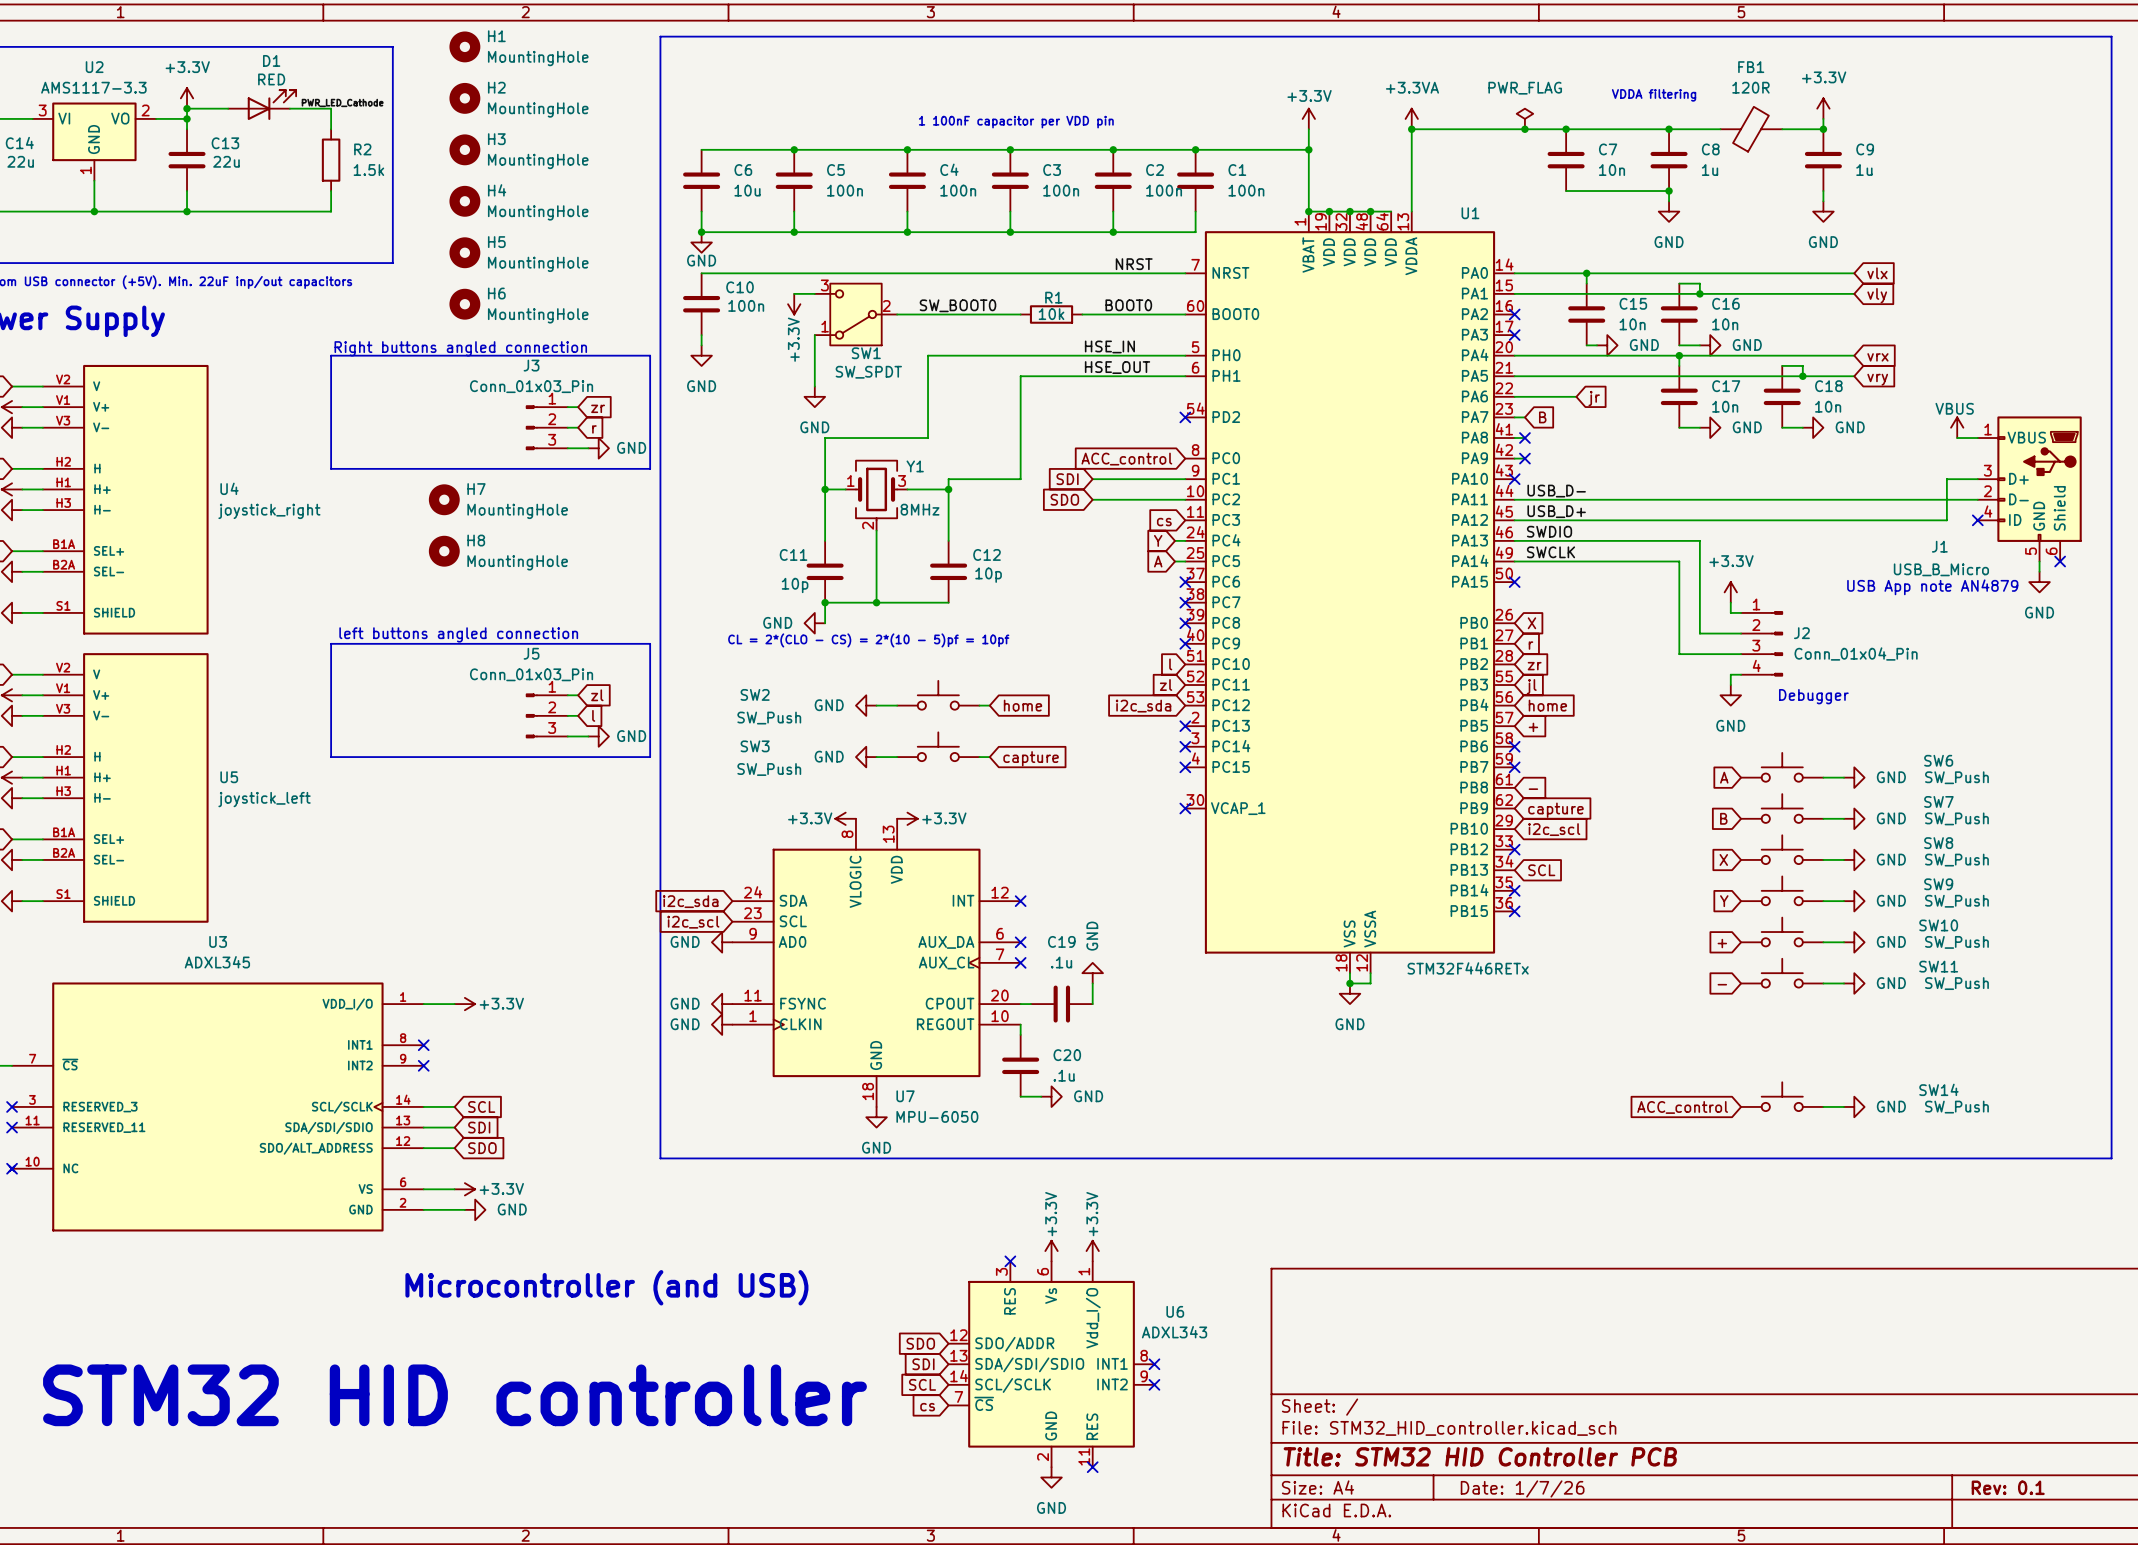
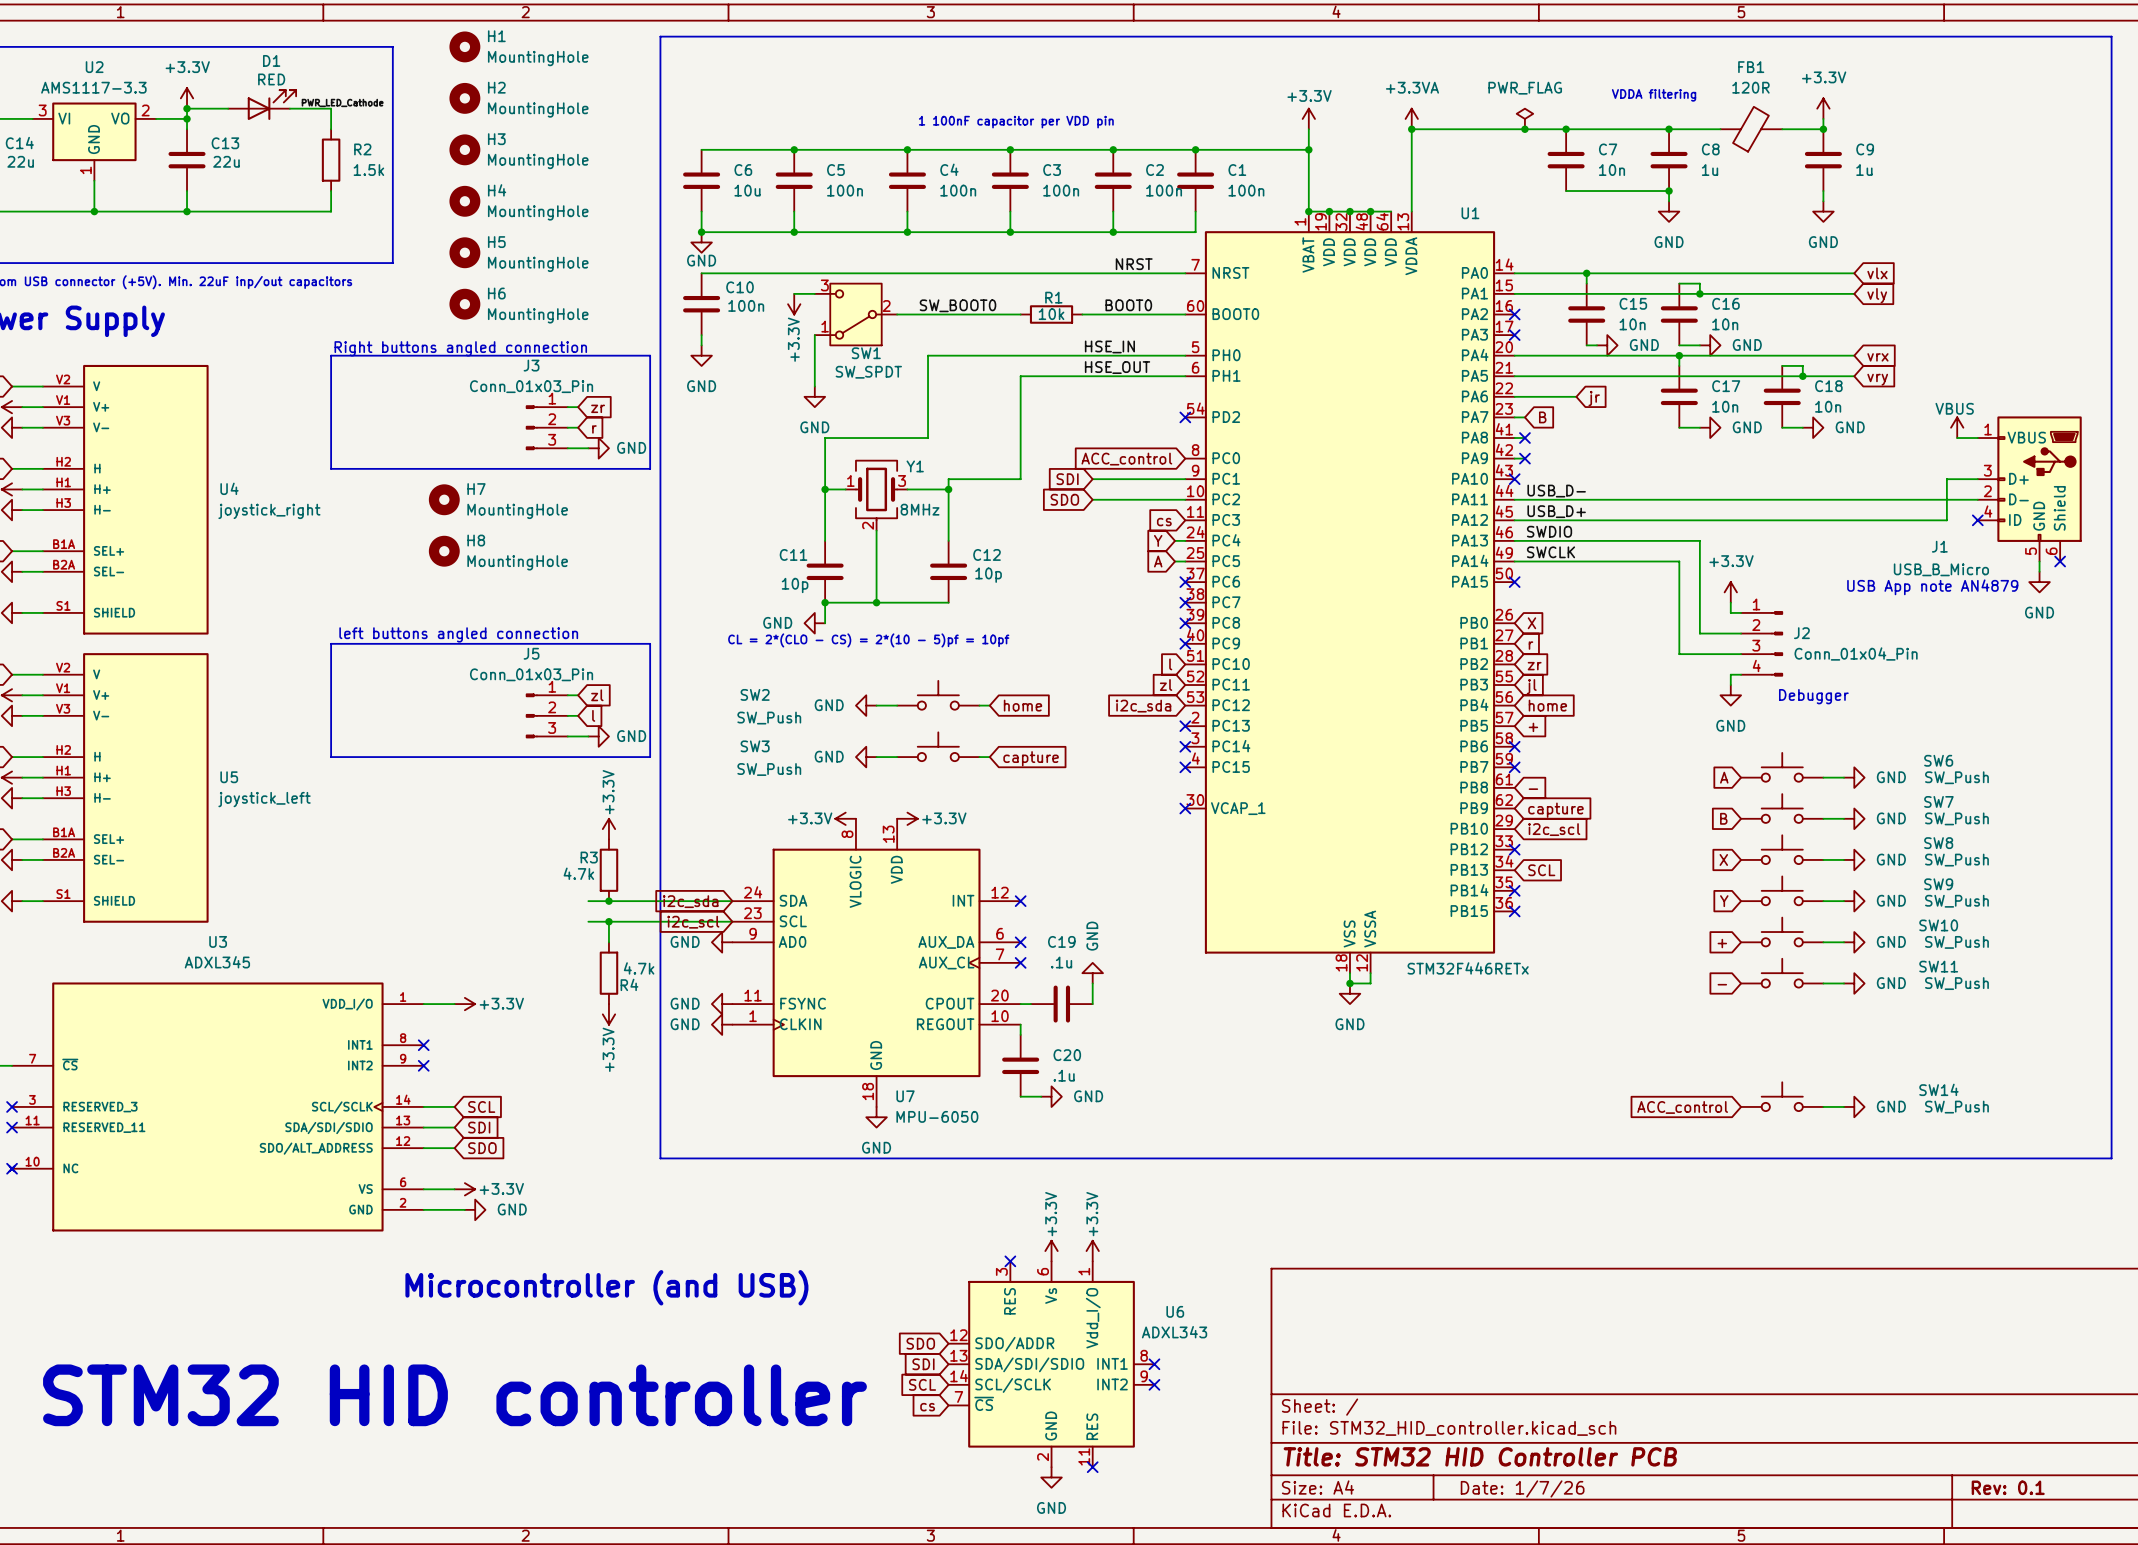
power symbol: none -> +3.3V (608, 829)
R3: none -> 4.7k (608, 870)
wire: none -> (588, 901) (732, 901)
junction: none -> (608, 901)
wire: none -> (588, 921) (732, 921)
wire: none -> (608, 921) (608, 942)
junction: none -> (608, 921)
R4: none -> 4.7k (608, 973)
power symbol: none -> +3.3V (608, 1014)

